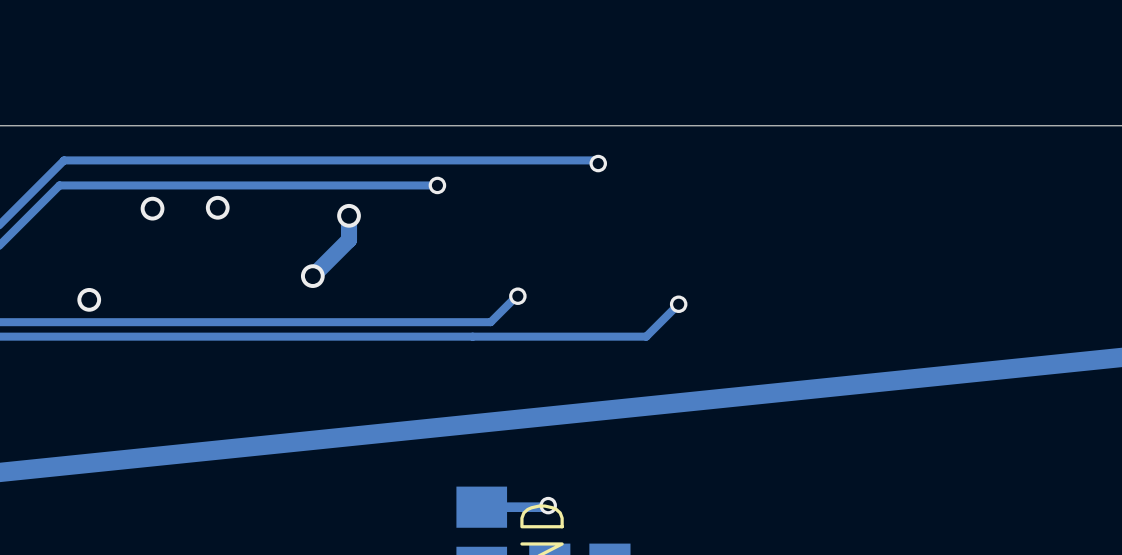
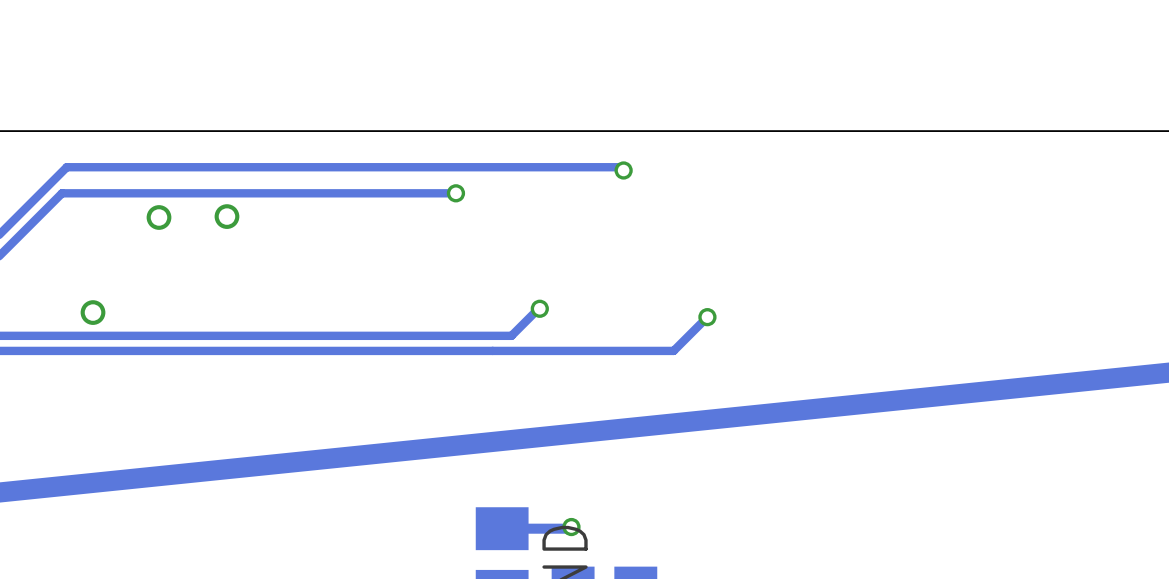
track: (349, 215) (349, 239) (312, 276) -> none
via: (349, 215) -> none
via: (312, 276) -> none

